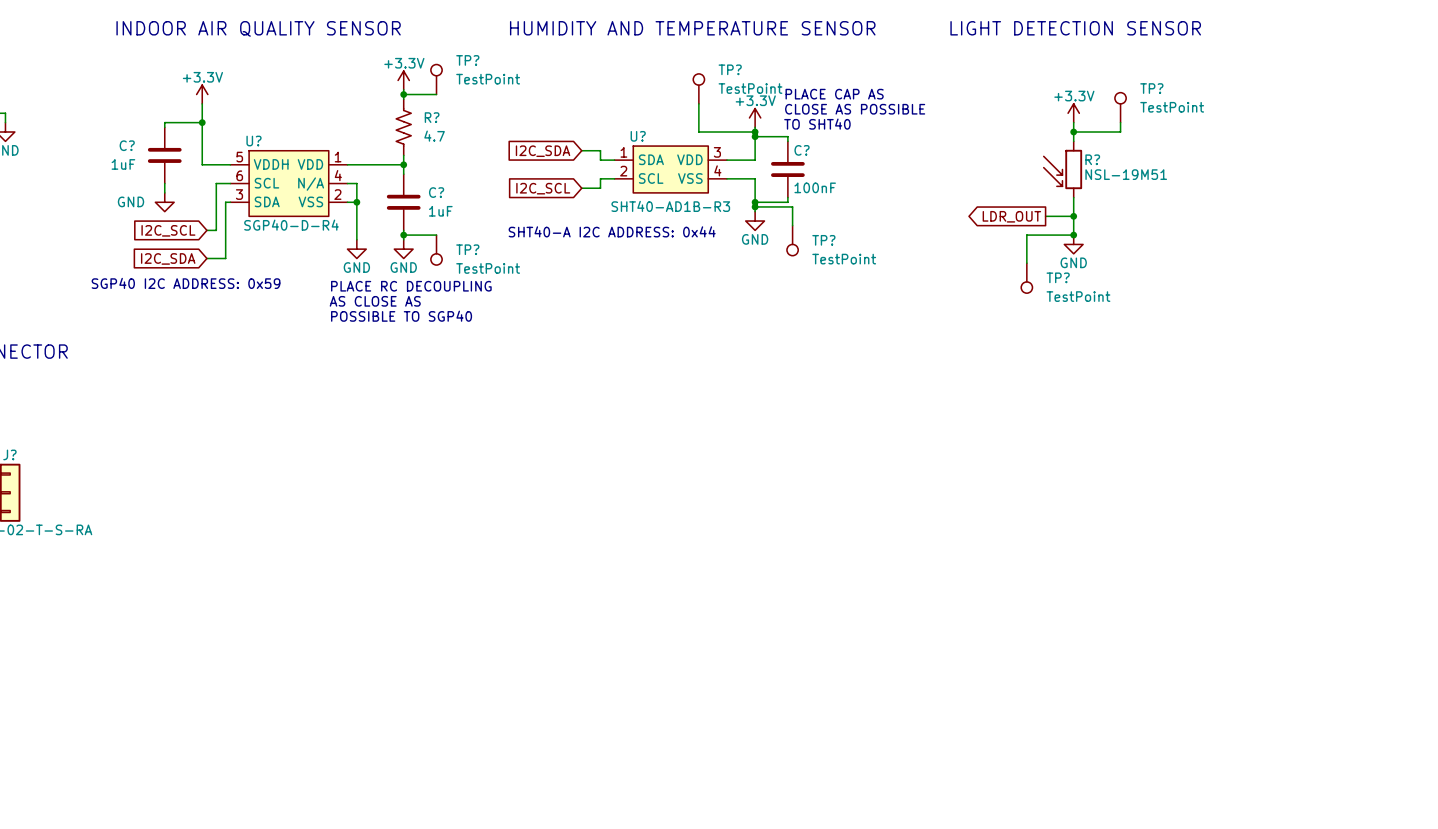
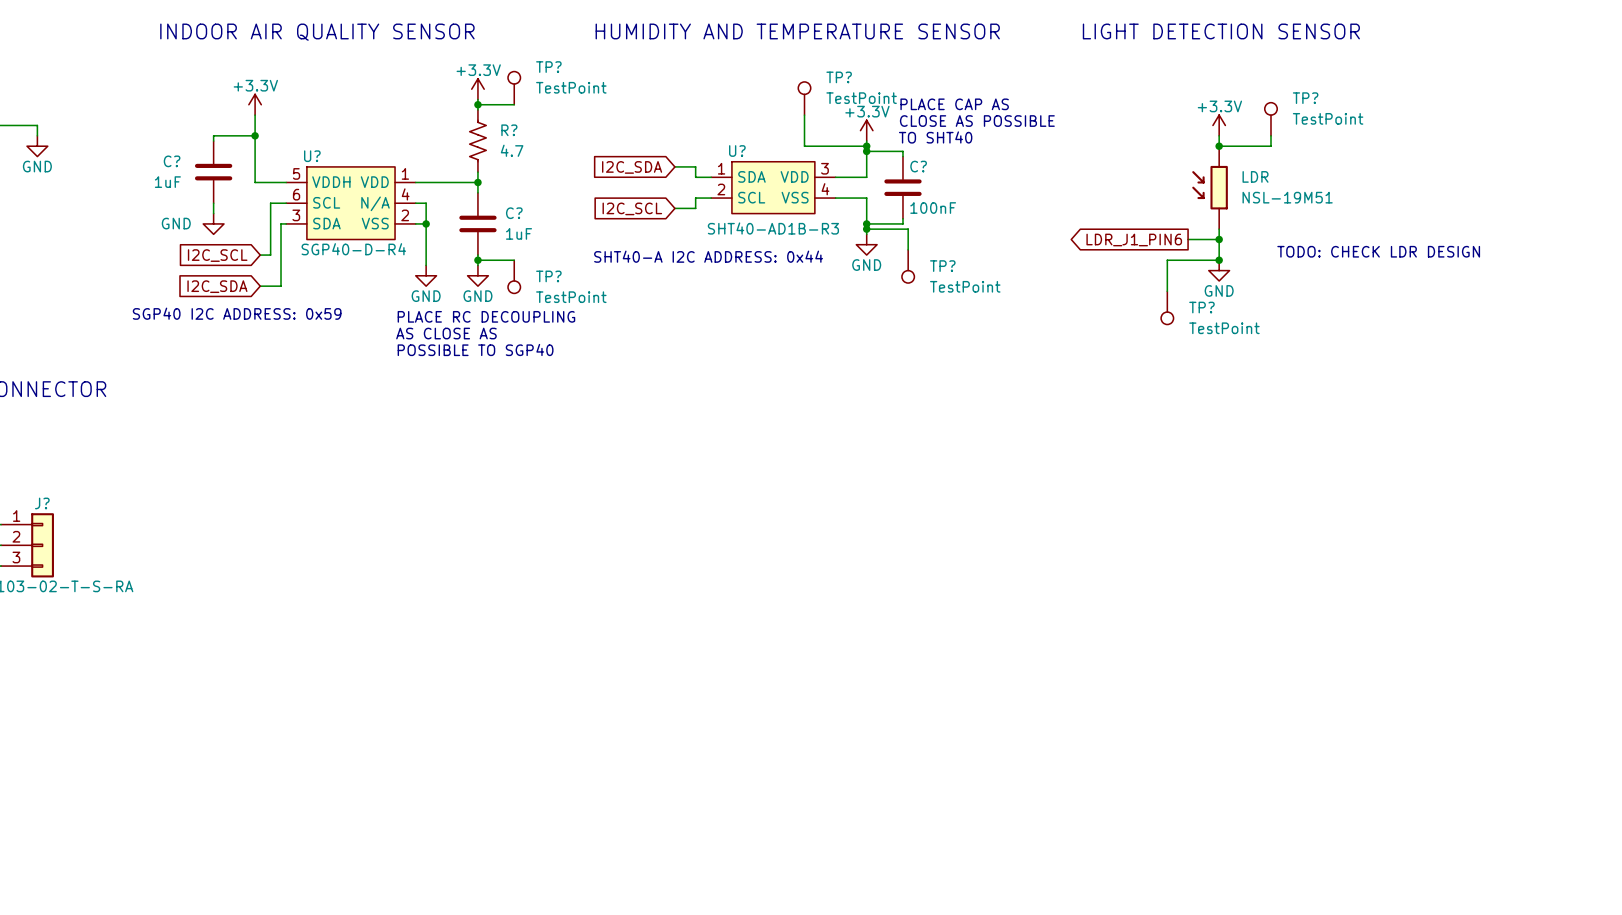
R?: NSL-19M51 (1062, 169) -> none
LDR: none -> NSL-19M51 (1210, 187)
global label: LDR_OUT (1011, 216) -> LDR_J1_PIN6 (1134, 240)
text: none -> TODO: CHECK LDR DESIGN (1378, 251)

